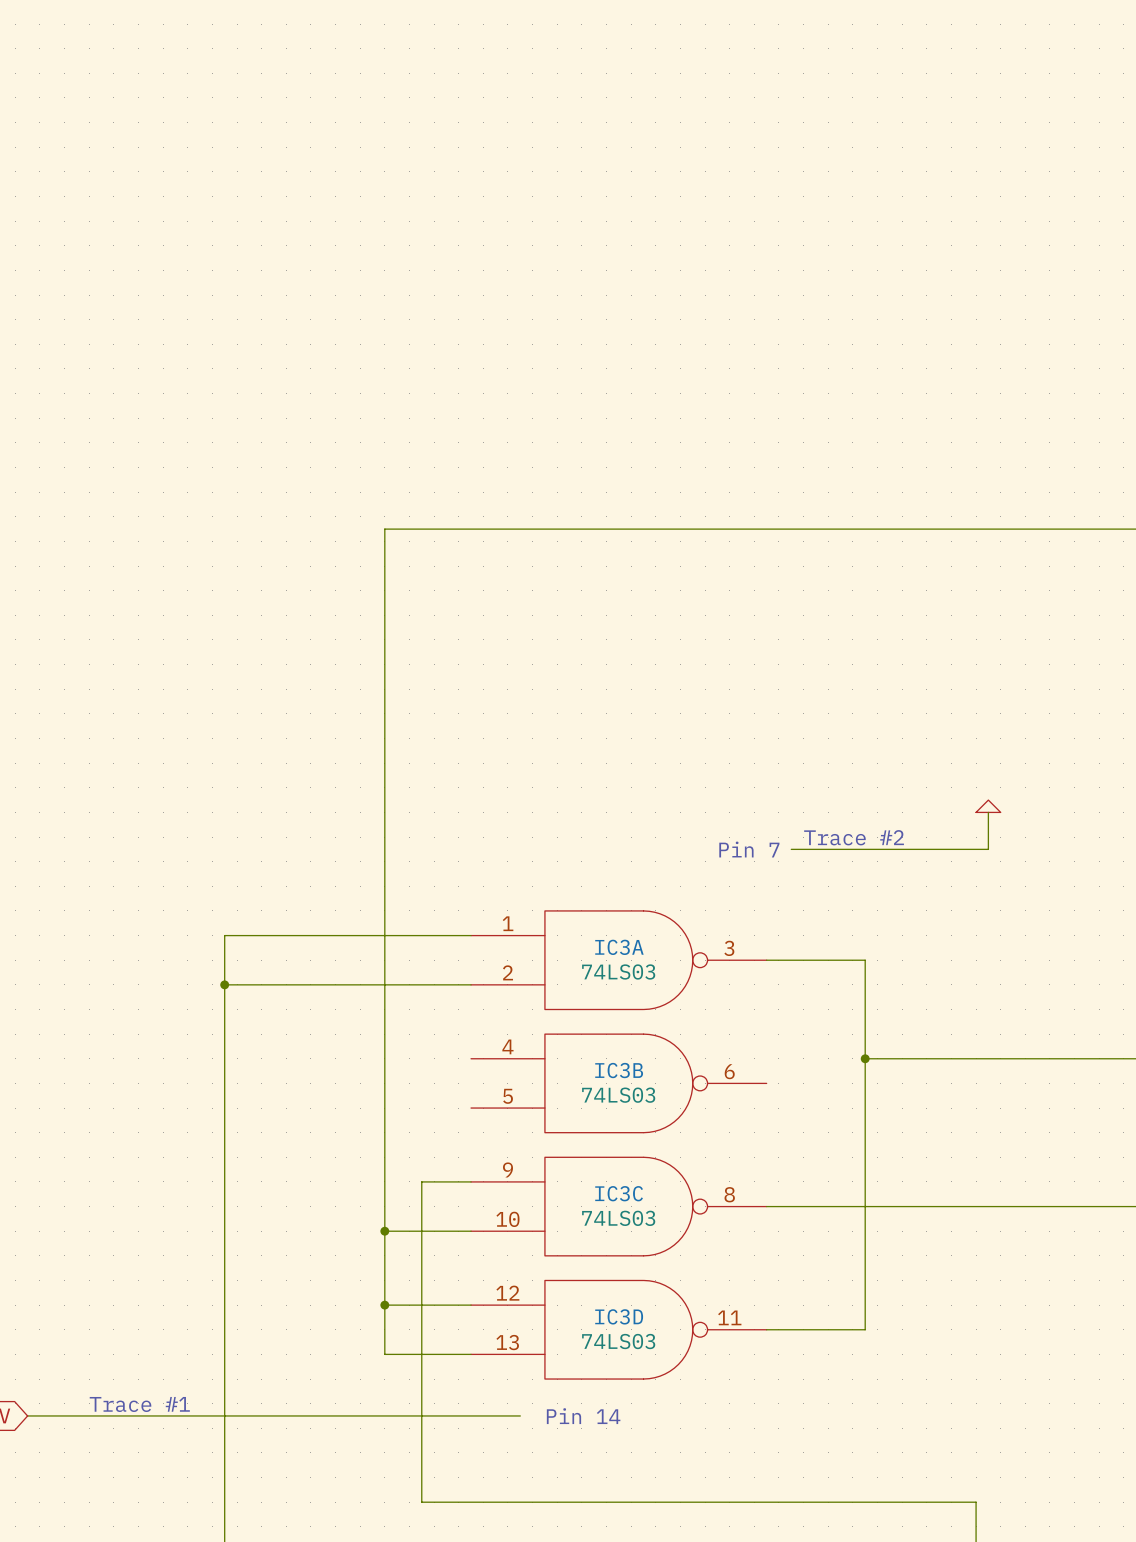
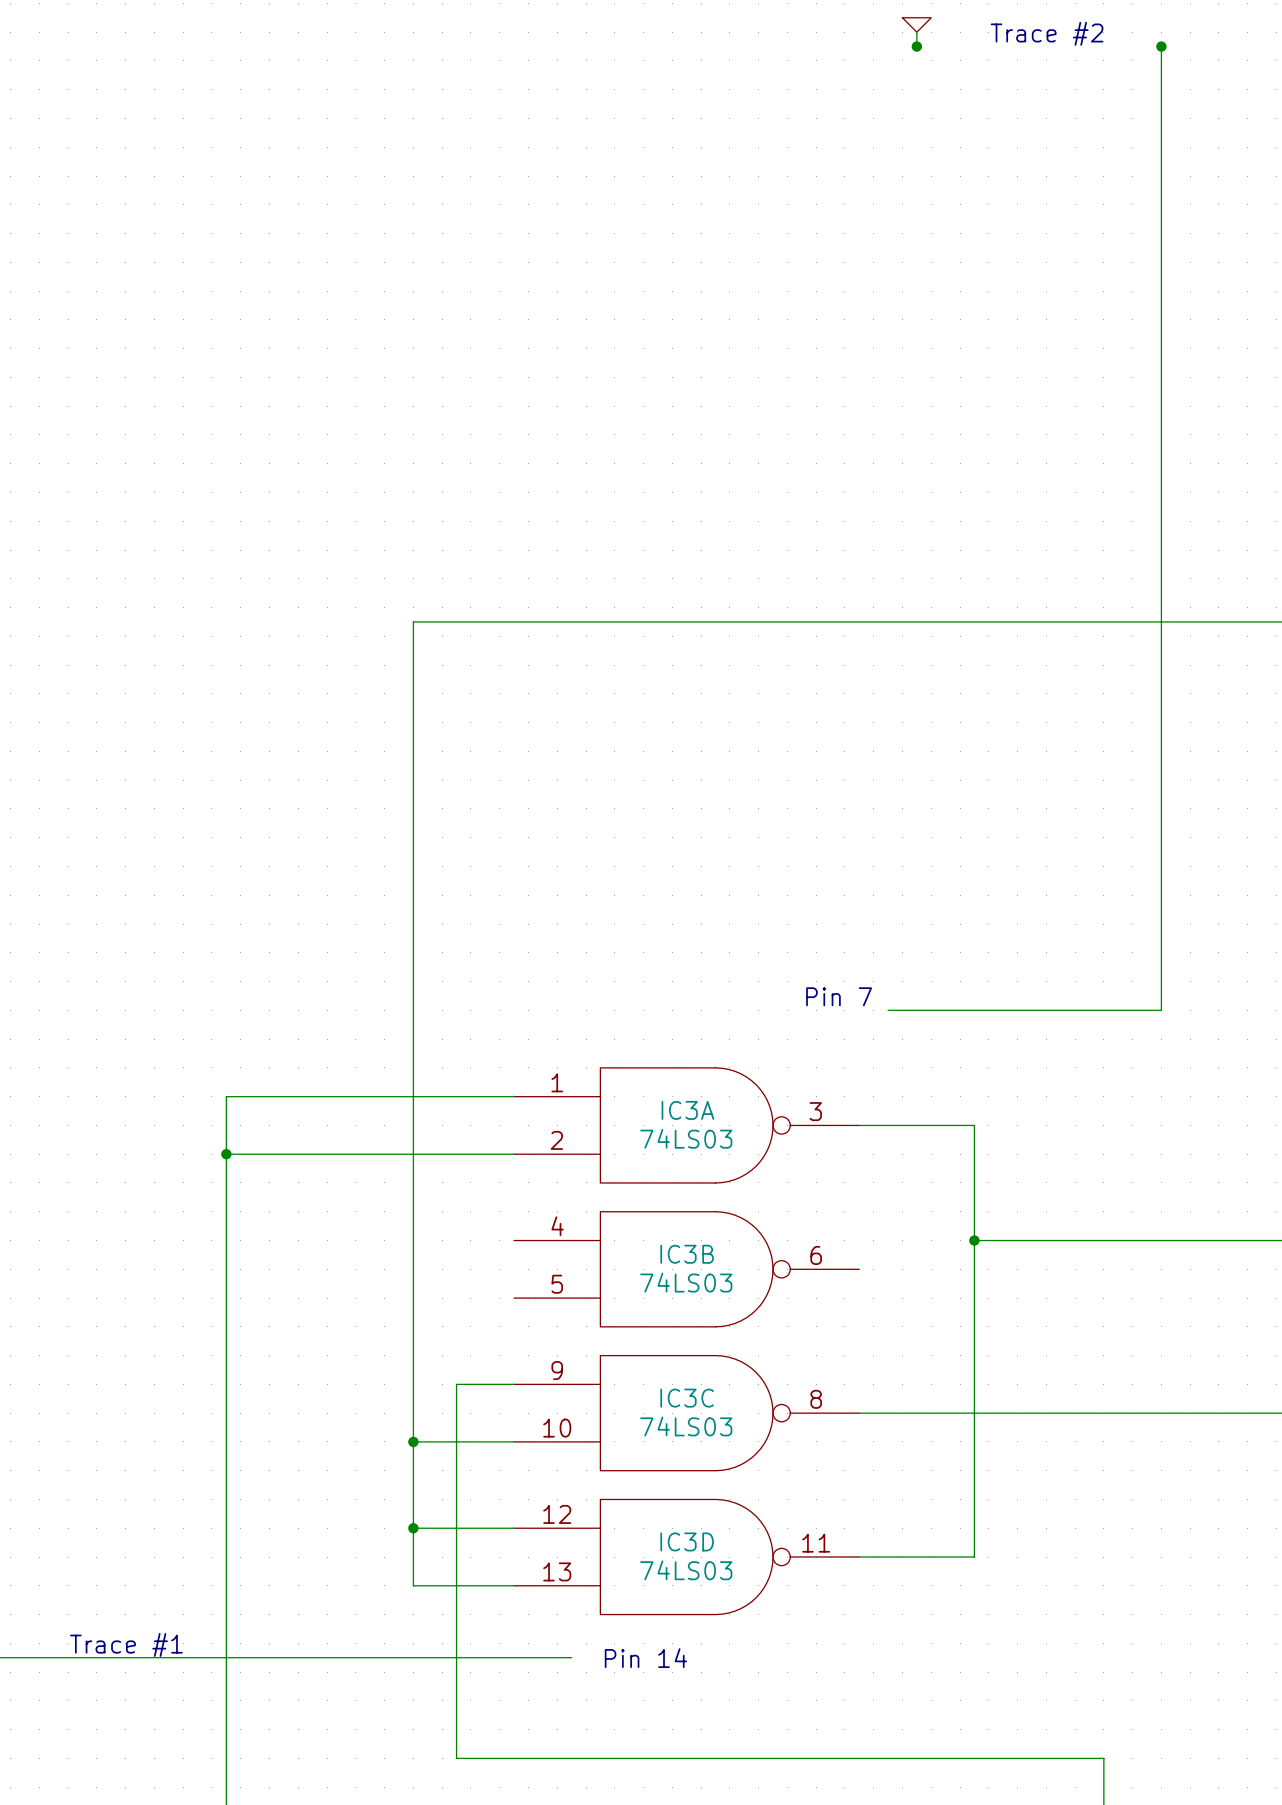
power symbol: none -> (916, 24)
wire: none -> (916, 32) (916, 46)
text: none -> Trace #2 (1047, 33)
junction: none -> (916, 46)
wire: none -> (1161, 46) (1161, 1010) (888, 1010)
junction: none -> (1161, 46)
power symbol: (988, 806) -> none
wire: (988, 812) (988, 849) (791, 849) -> none
text: Trace #2 (854, 837) -> none

